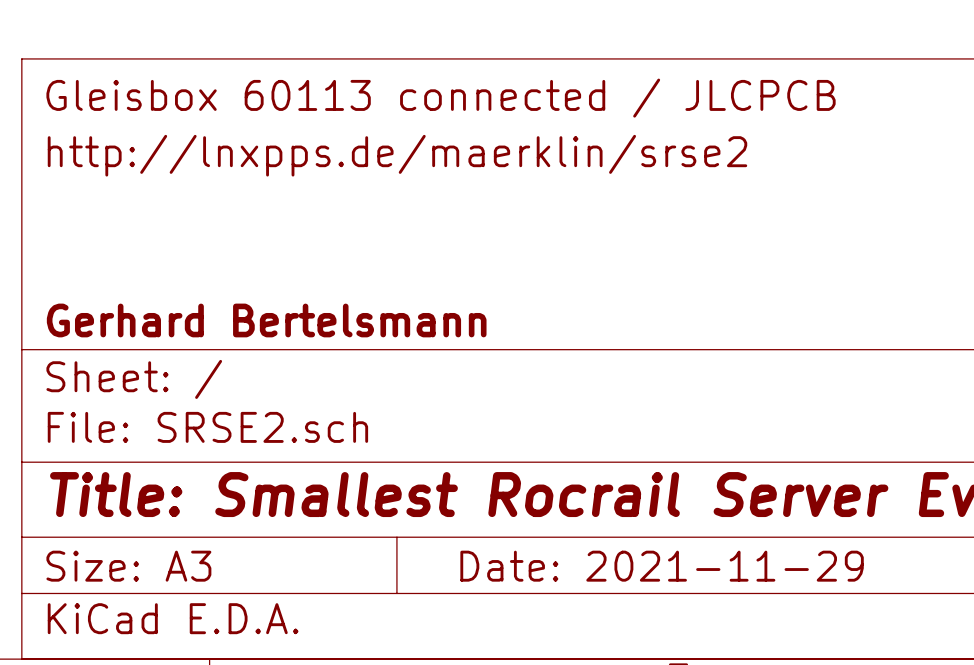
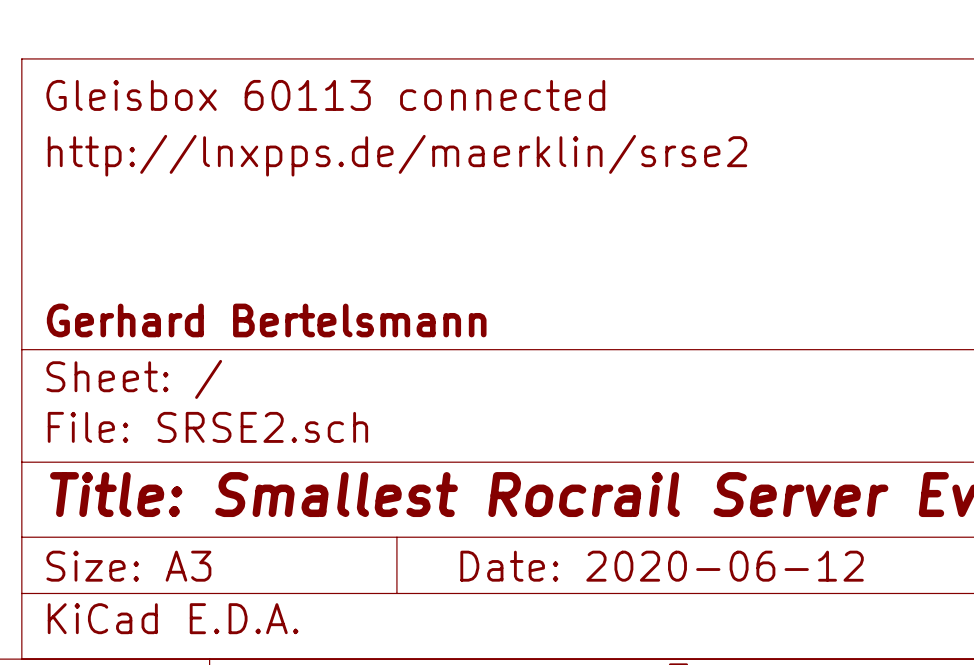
title block: Gleisbox 60113 connected / JLCPCB (441, 98) -> Gleisbox 60113 connected (325, 95)
title block: Date: 2021-11-29 (662, 566) -> Date: 2020-06-12 (662, 566)

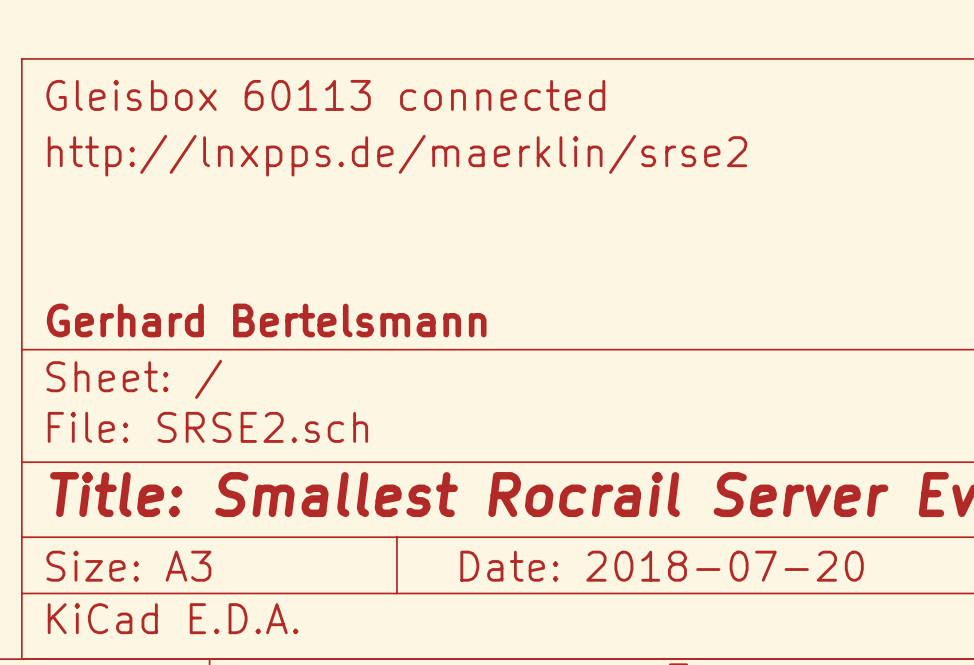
title block: Date: 2020-06-12 (662, 566) -> Date: 2018-07-20 (662, 566)

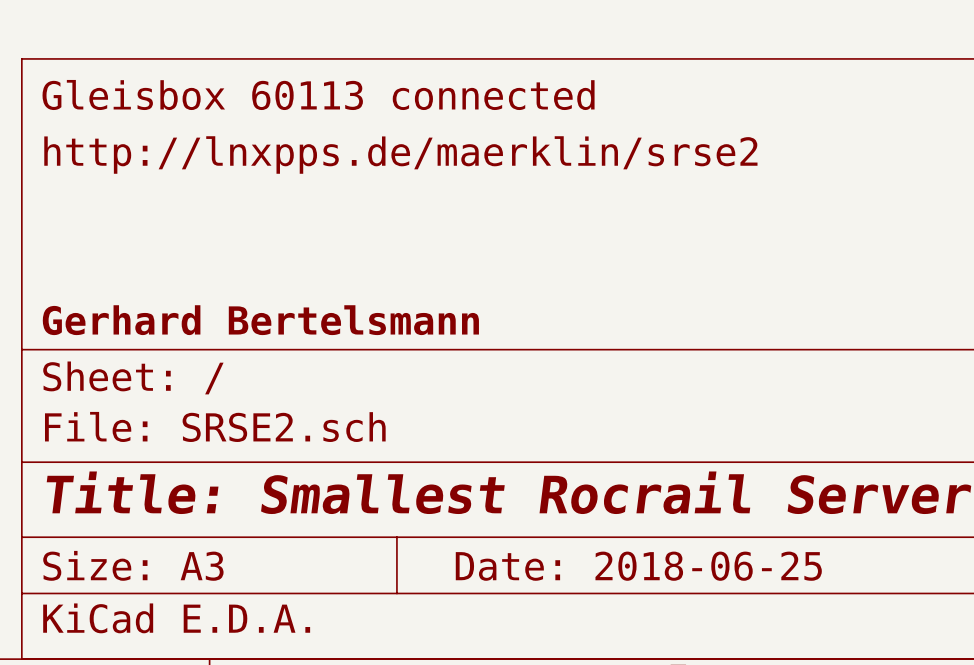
title block: Date: 2018-07-20 (662, 566) -> Date: 2018-06-25 (638, 566)

